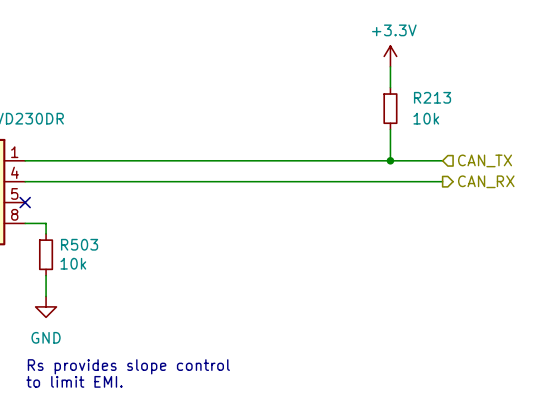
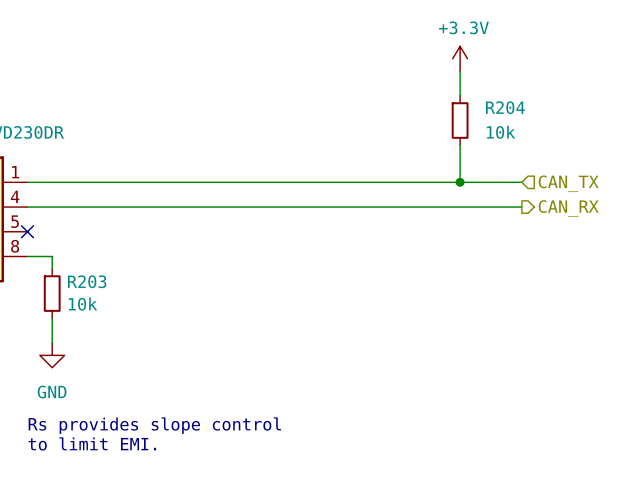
R213 name: R213 (432, 97) -> R204 (505, 107)
R503 name: R503 (79, 244) -> R203 (87, 281)

